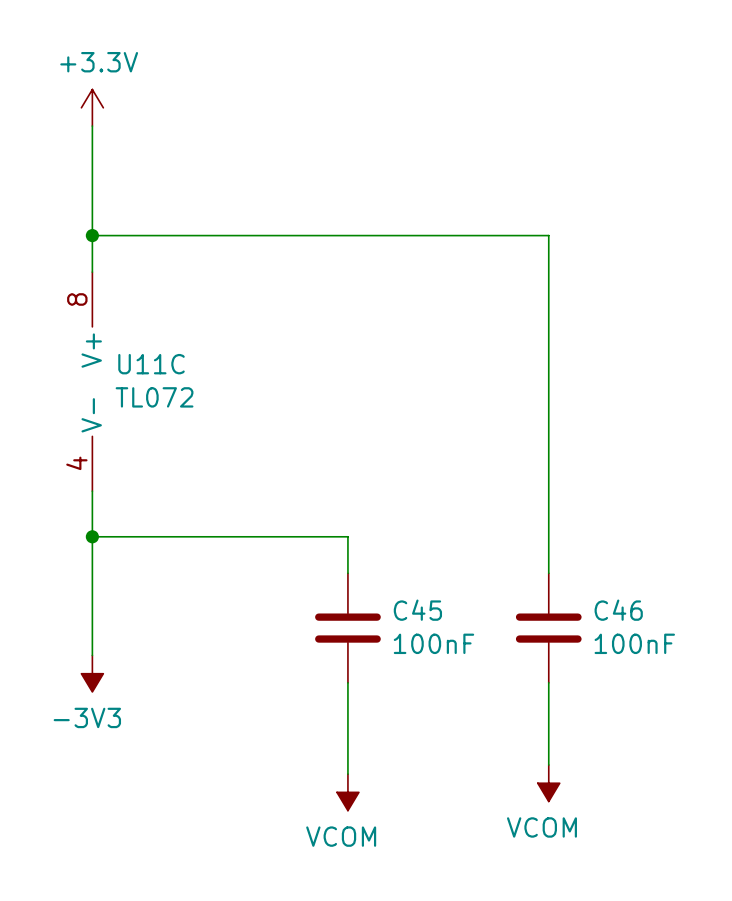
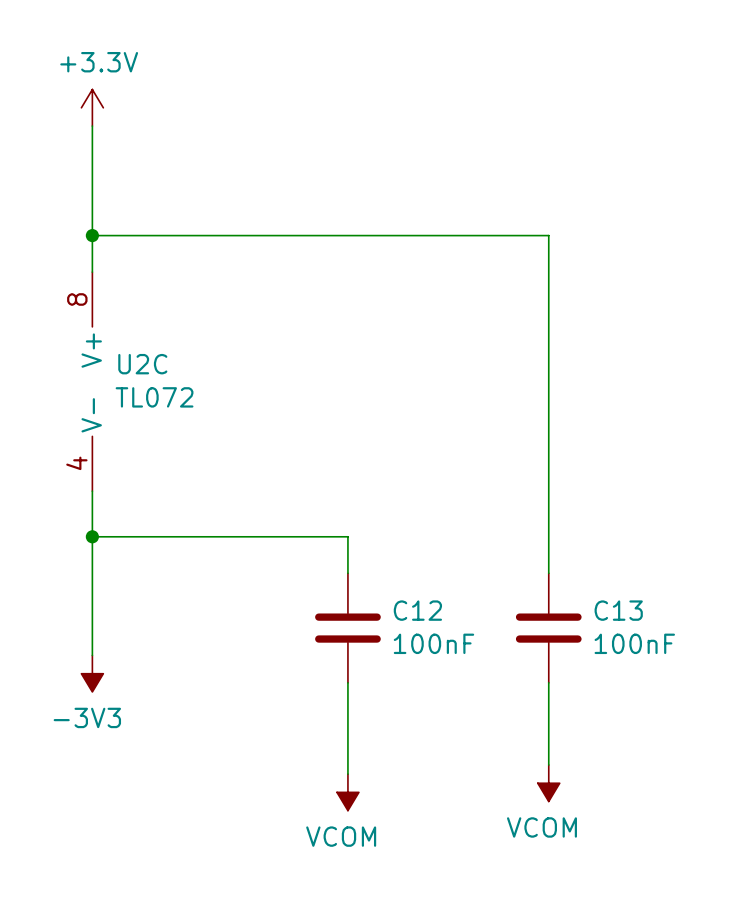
U11C name: U11C (151, 364) -> U2C (142, 364)
C45 name: C45 (417, 610) -> C12 (417, 610)
C46 name: C46 (618, 610) -> C13 (618, 610)

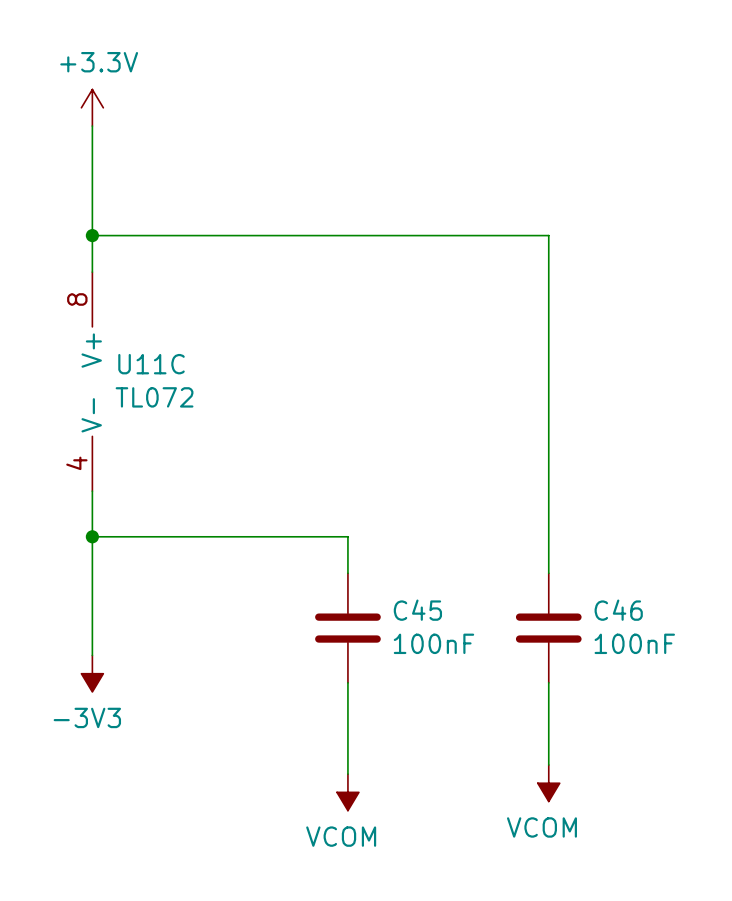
U2C name: U2C (142, 364) -> U11C (151, 364)
C12 name: C12 (417, 610) -> C45 (417, 610)
C13 name: C13 (618, 610) -> C46 (618, 610)

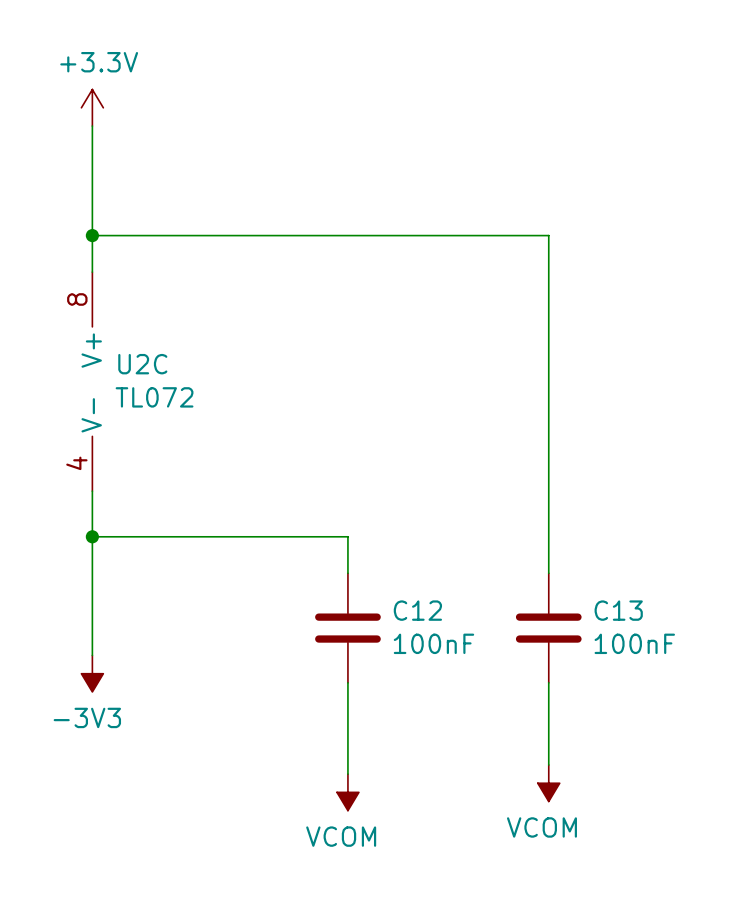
U11C name: U11C (151, 364) -> U2C (142, 364)
C45 name: C45 (417, 610) -> C12 (417, 610)
C46 name: C46 (618, 610) -> C13 (618, 610)

